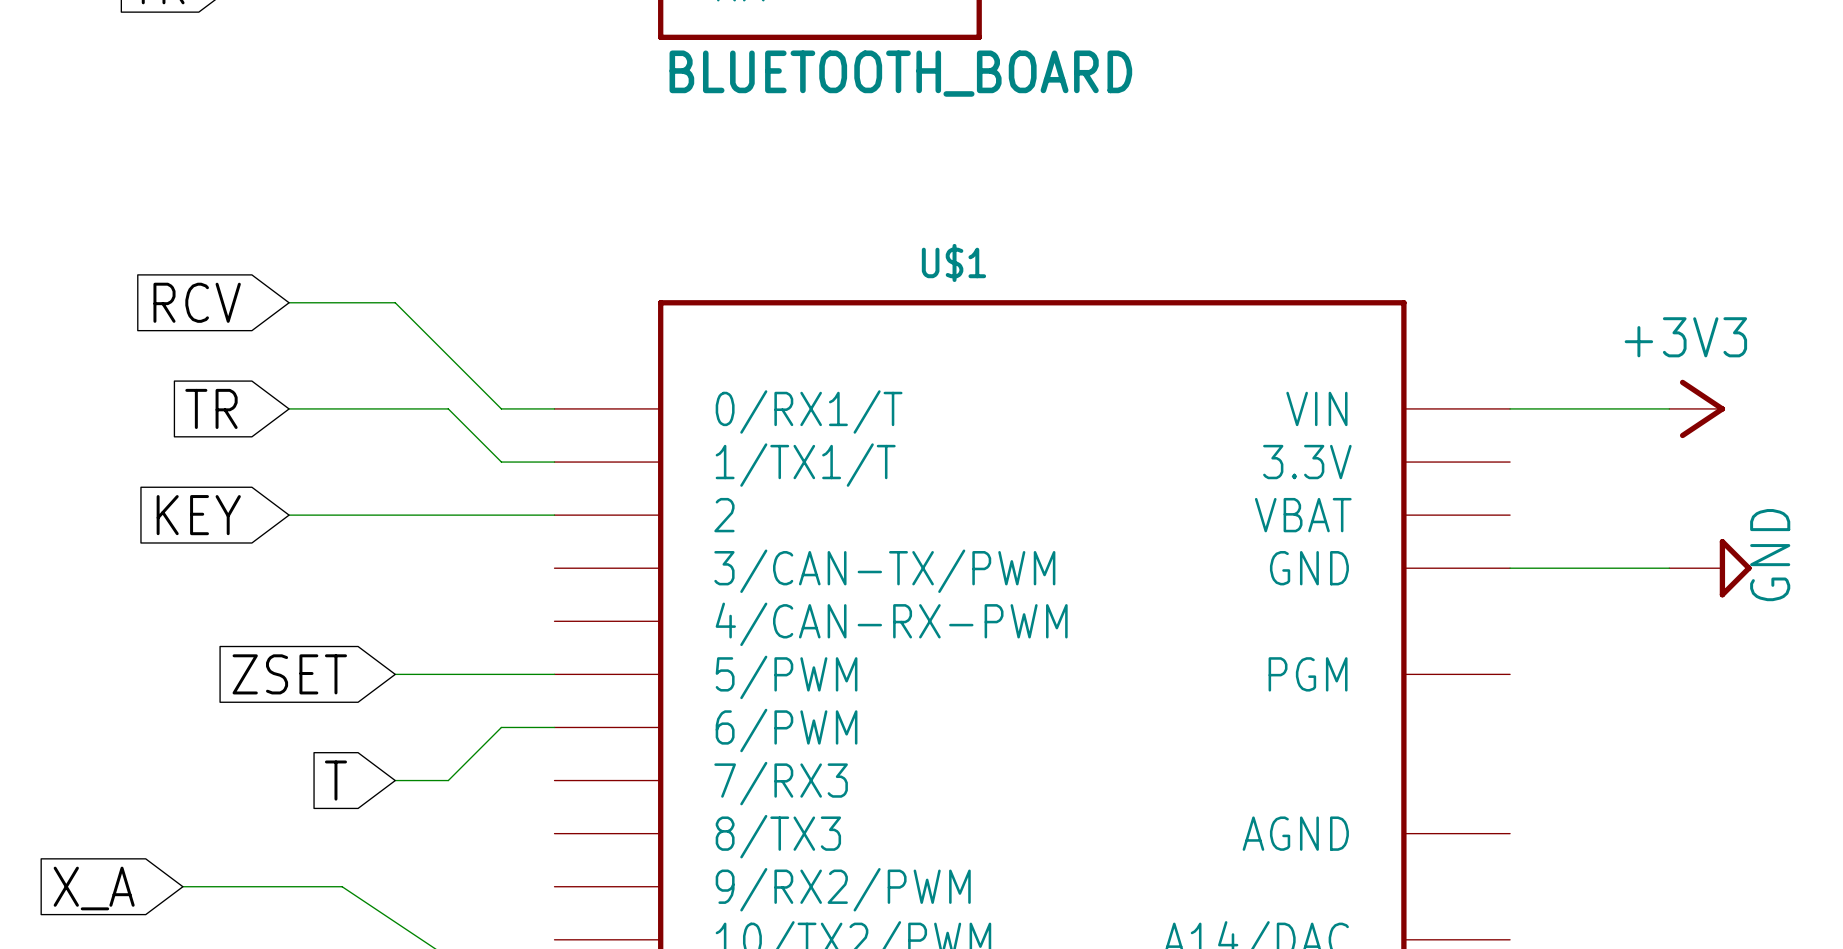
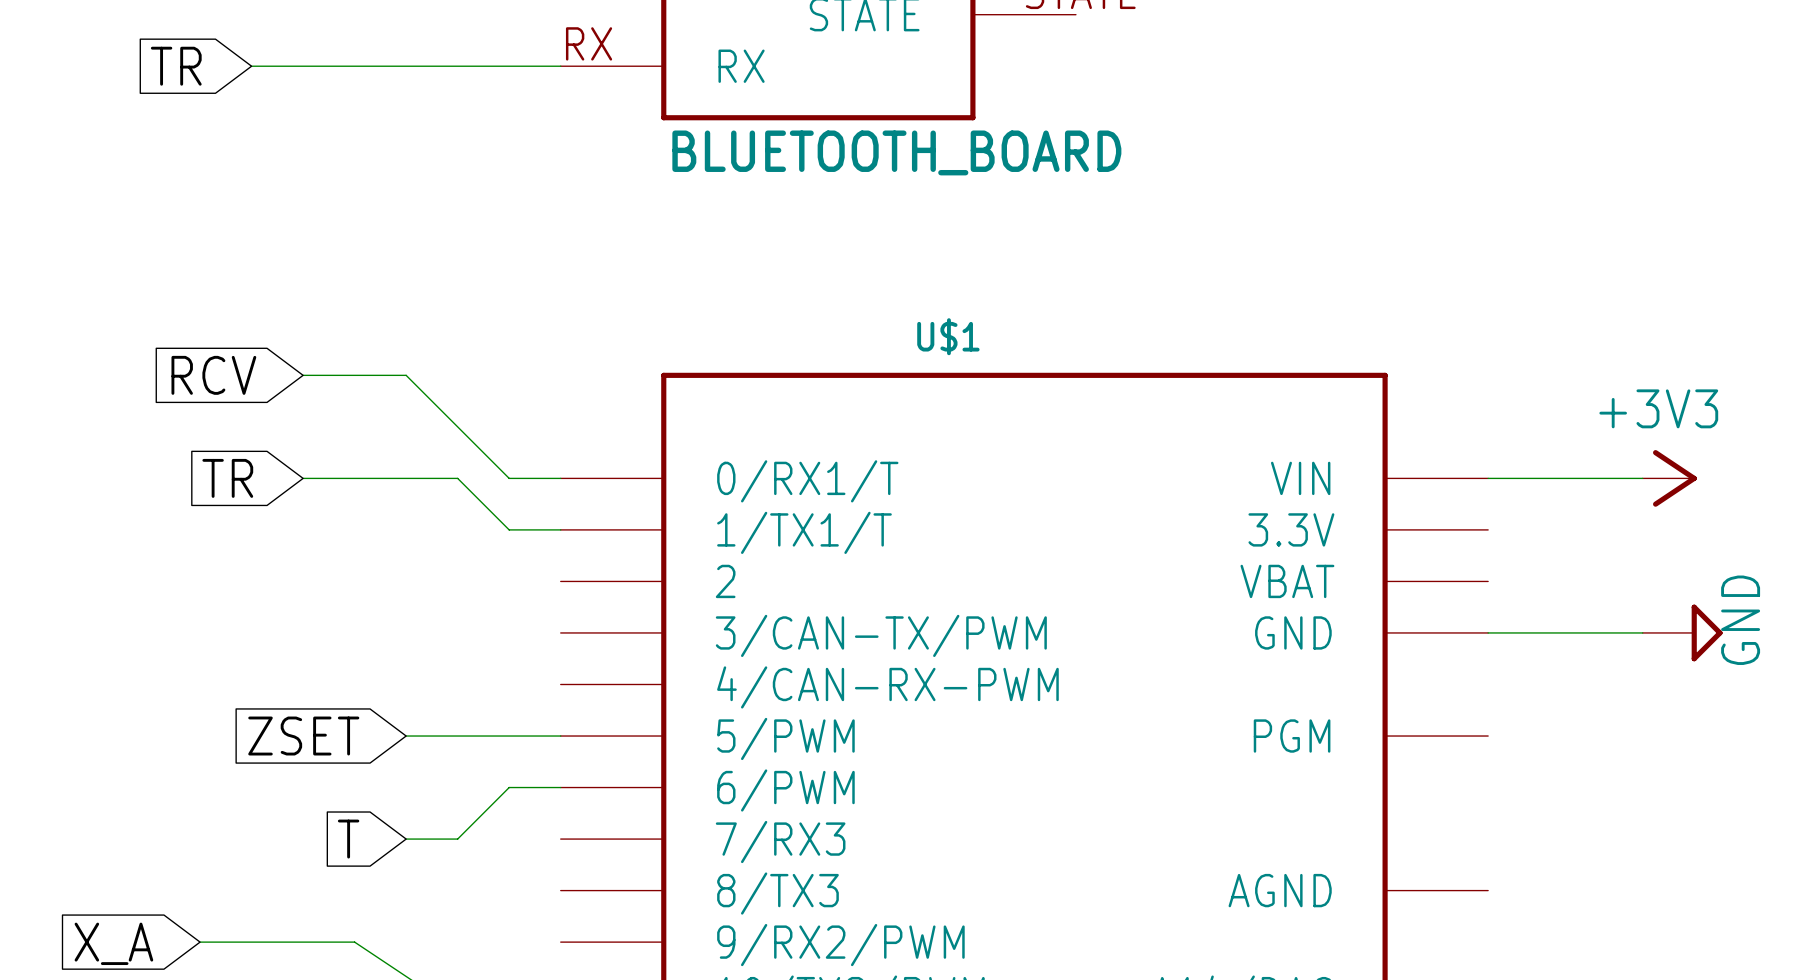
global label: KEY (198, 515) -> none
wire: (289, 515) (554, 515) -> none

